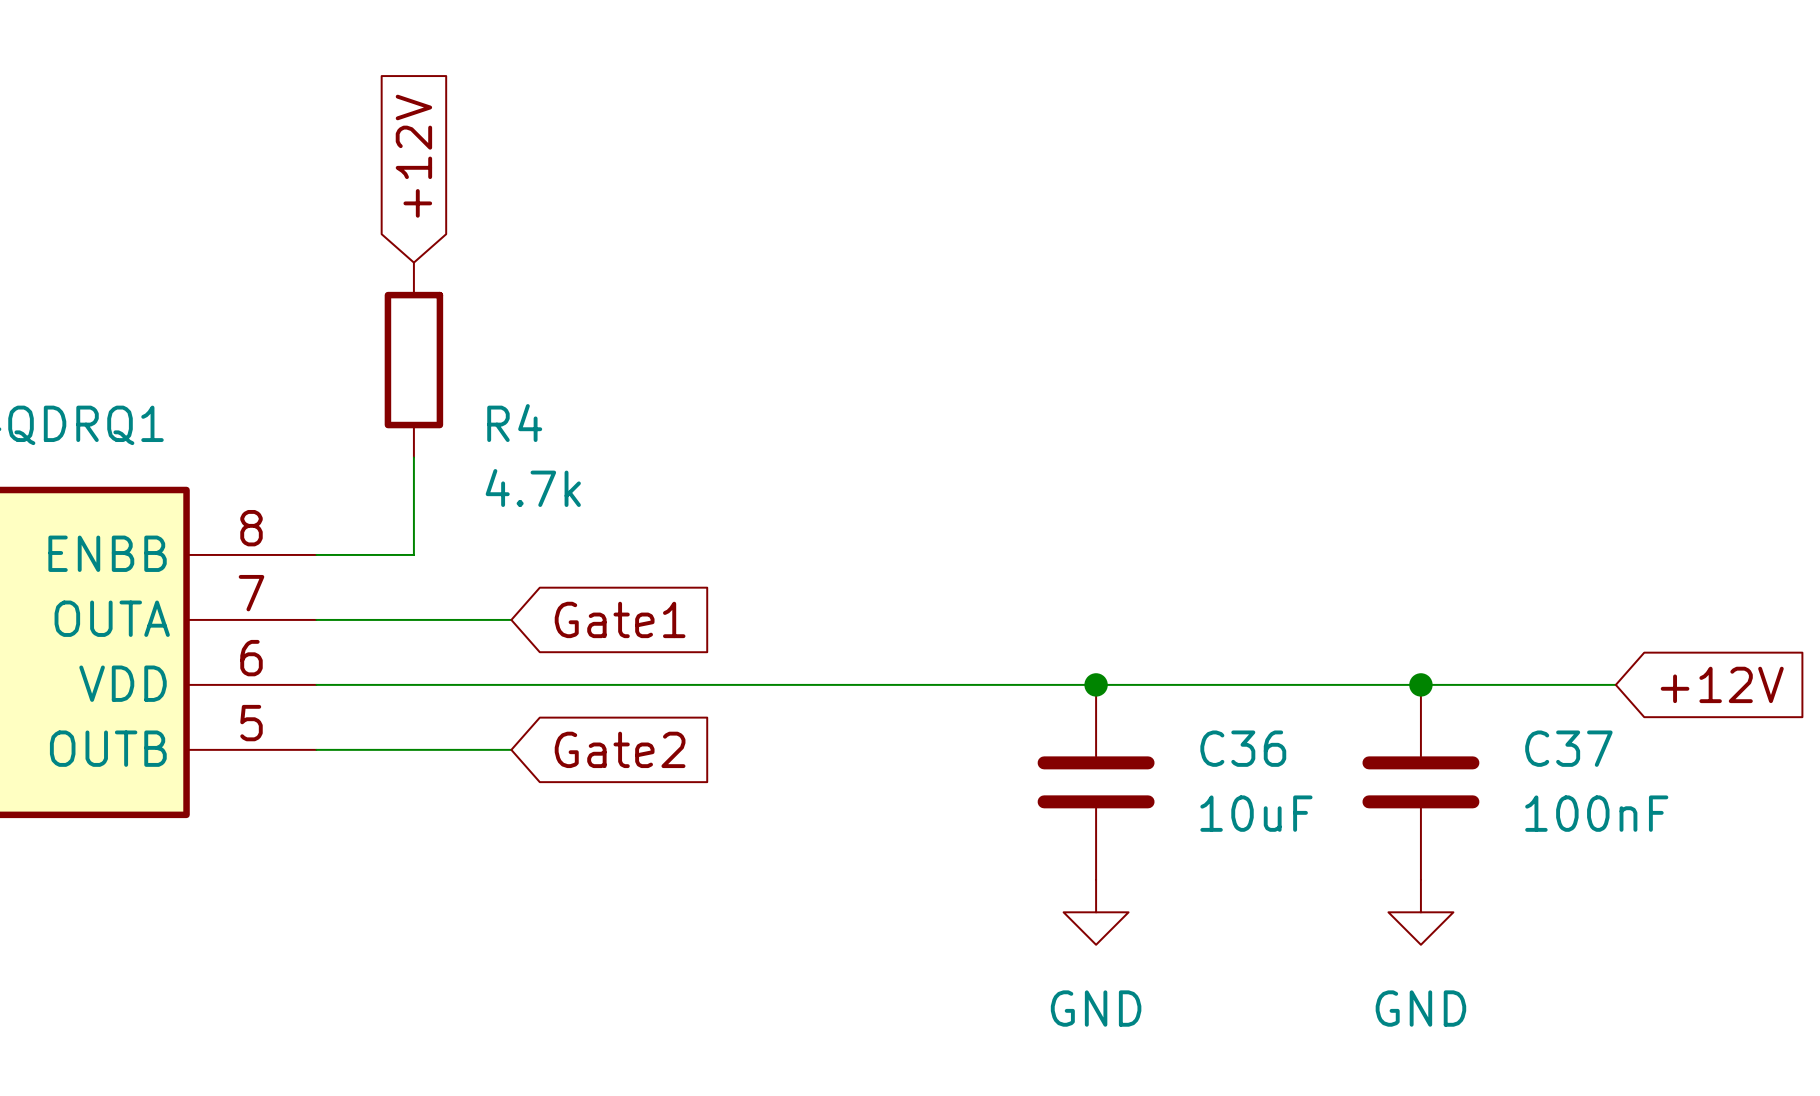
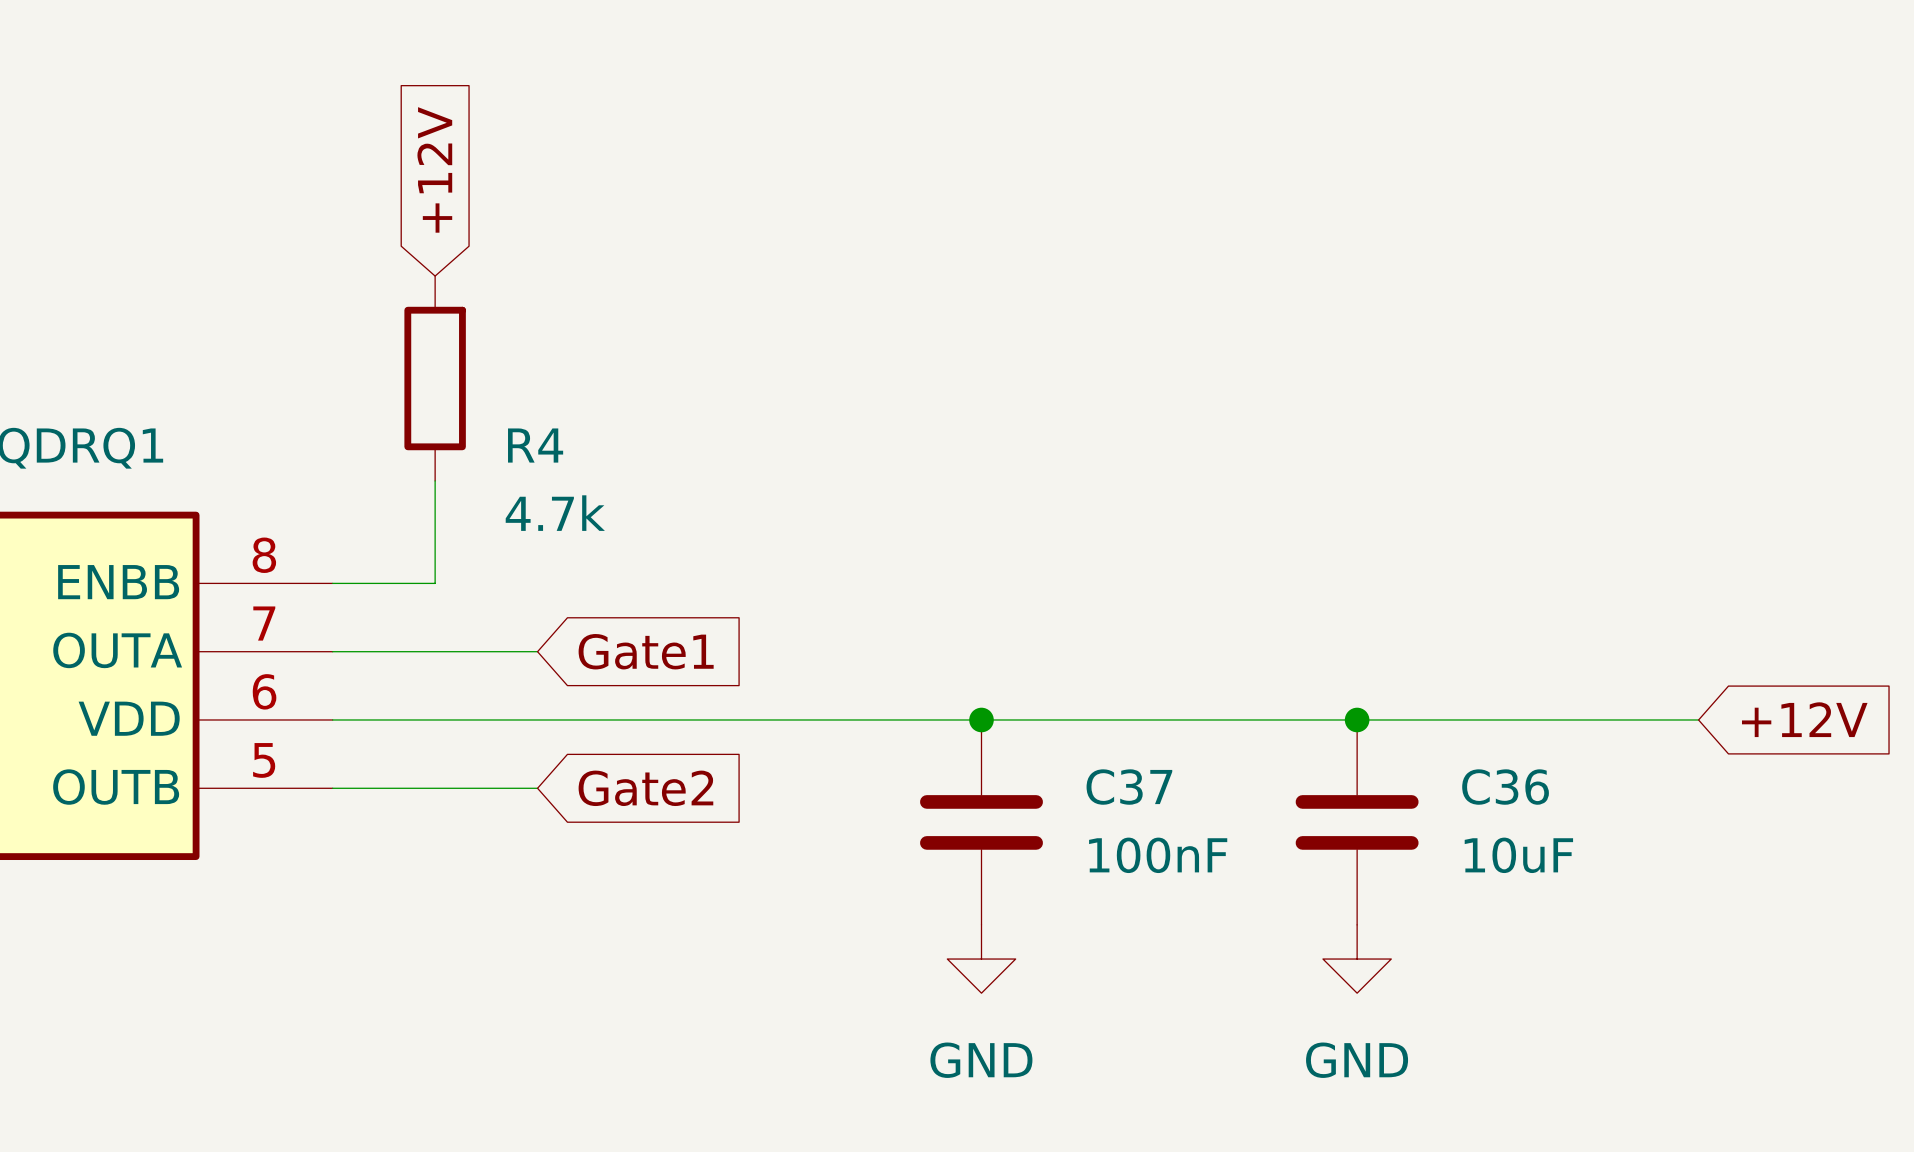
junction: none -> (981, 719)
junction: (1096, 684) -> none
junction: none -> (1357, 719)
junction: (1420, 684) -> none
C36 position: (1096, 782) -> (1357, 822)
C37 position: (1420, 782) -> (981, 822)
power symbol: none -> GND (981, 959)
power symbol: GND (1096, 912) -> none
power symbol: none -> GND (1357, 959)
power symbol: GND (1420, 912) -> none

